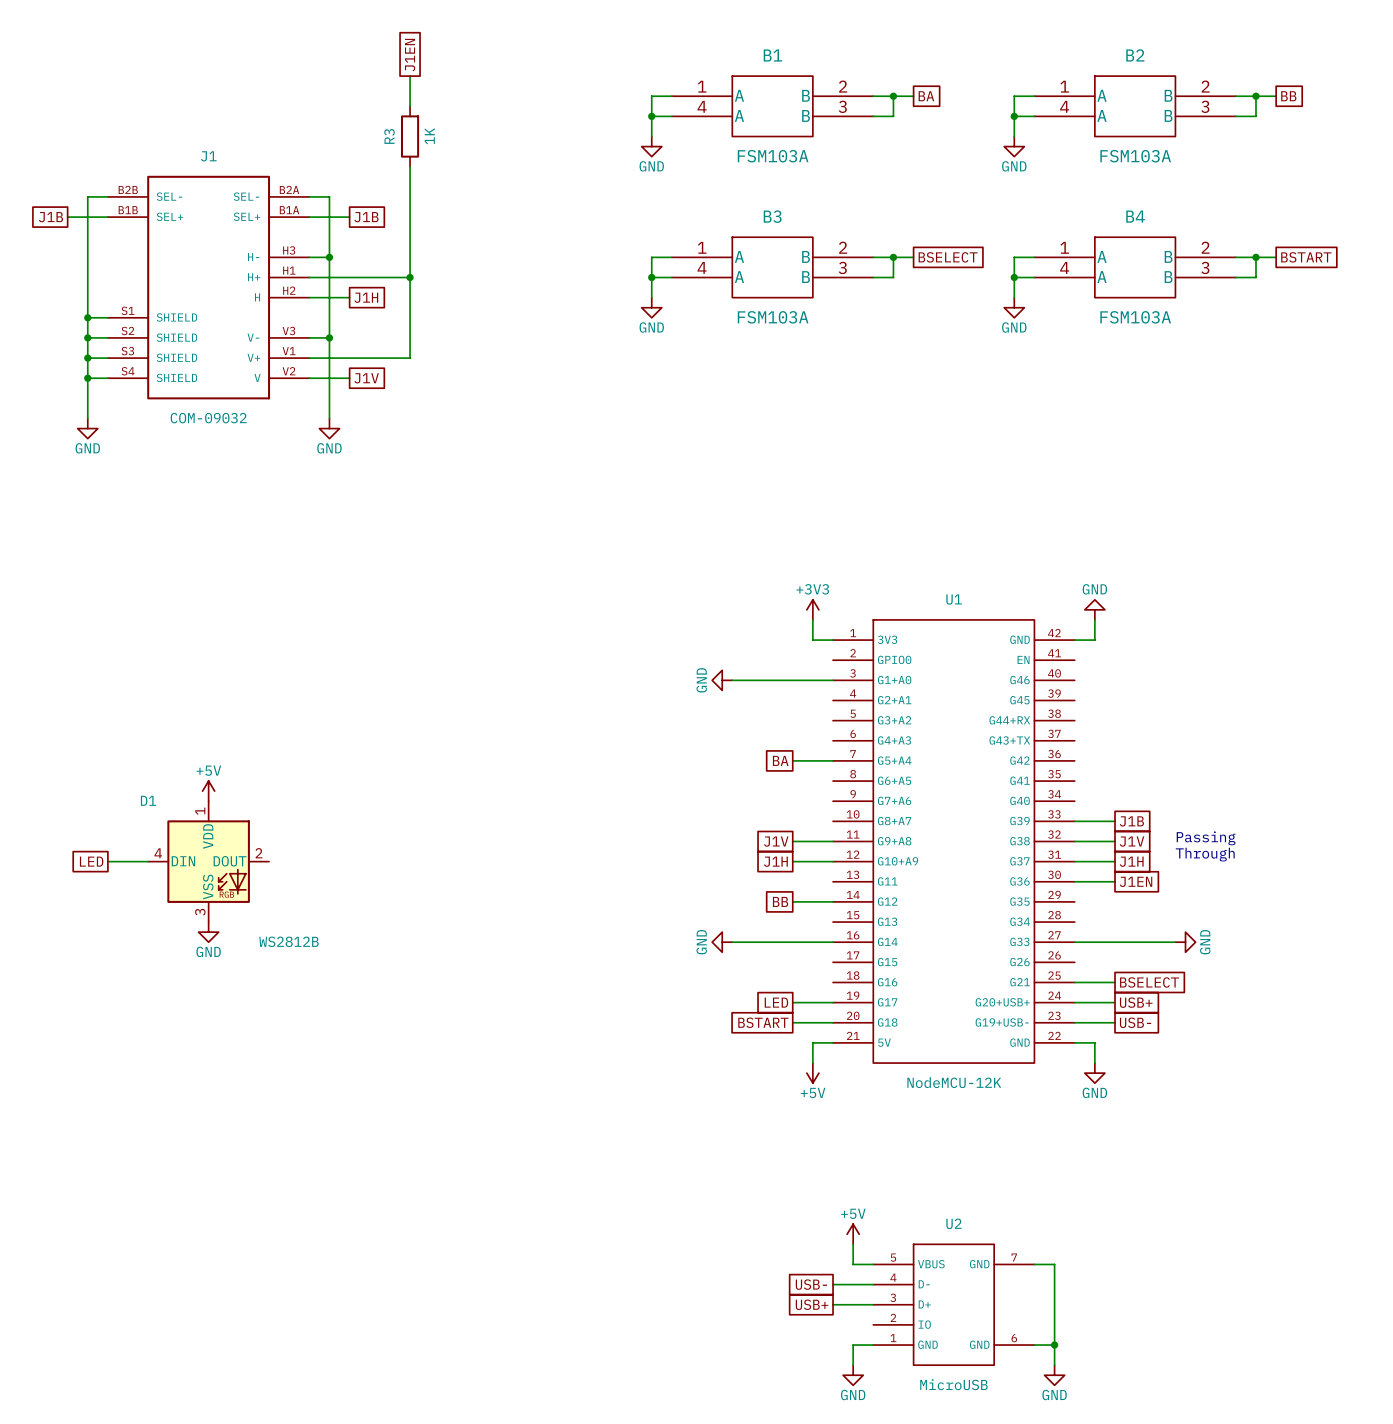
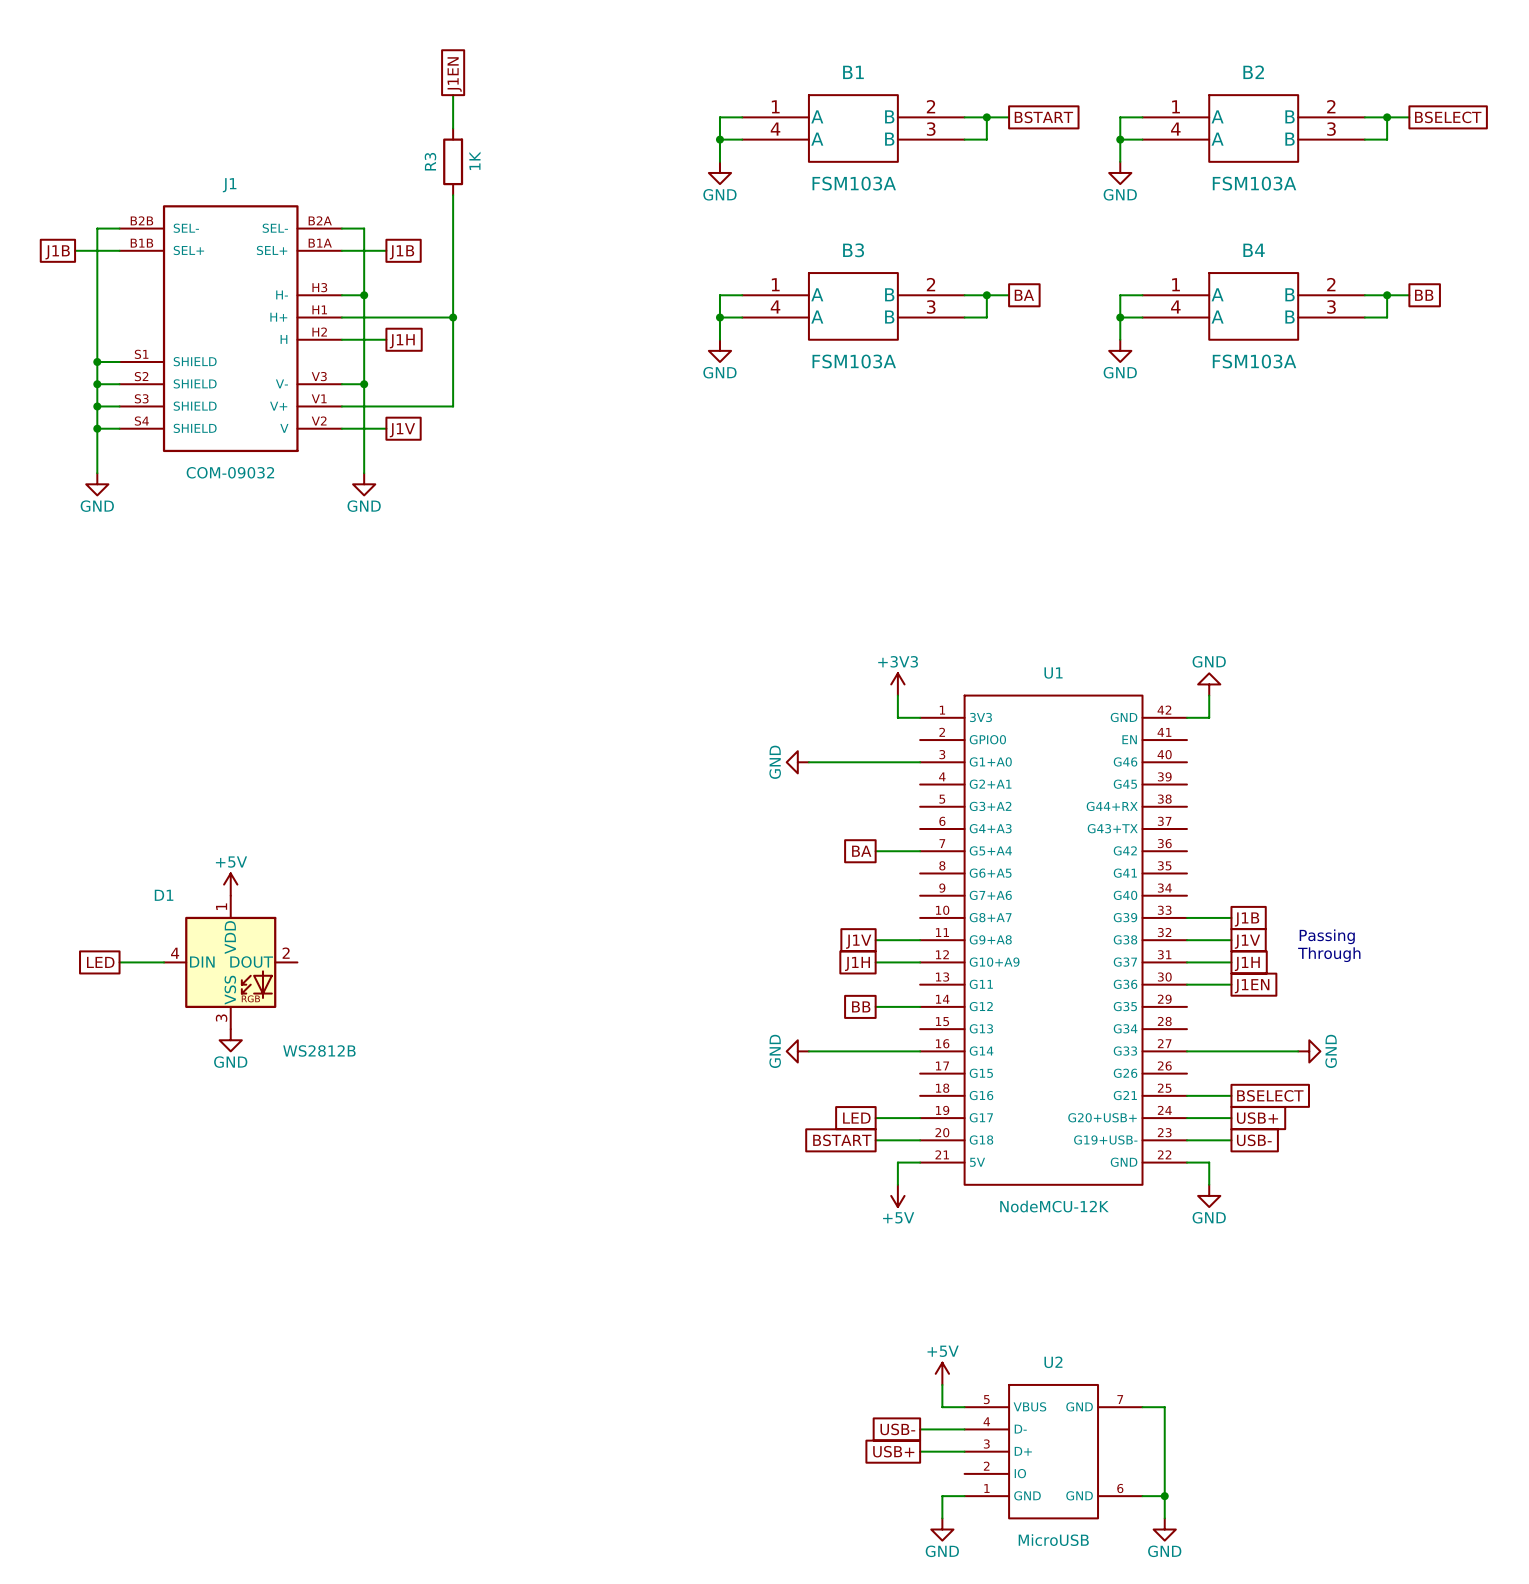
global label: BA (926, 96) -> BSTART (1043, 117)
global label: BB (1288, 96) -> BSELECT (1448, 117)
global label: BSELECT (948, 257) -> BA (1024, 295)
global label: BSTART (1306, 257) -> BB (1424, 295)

